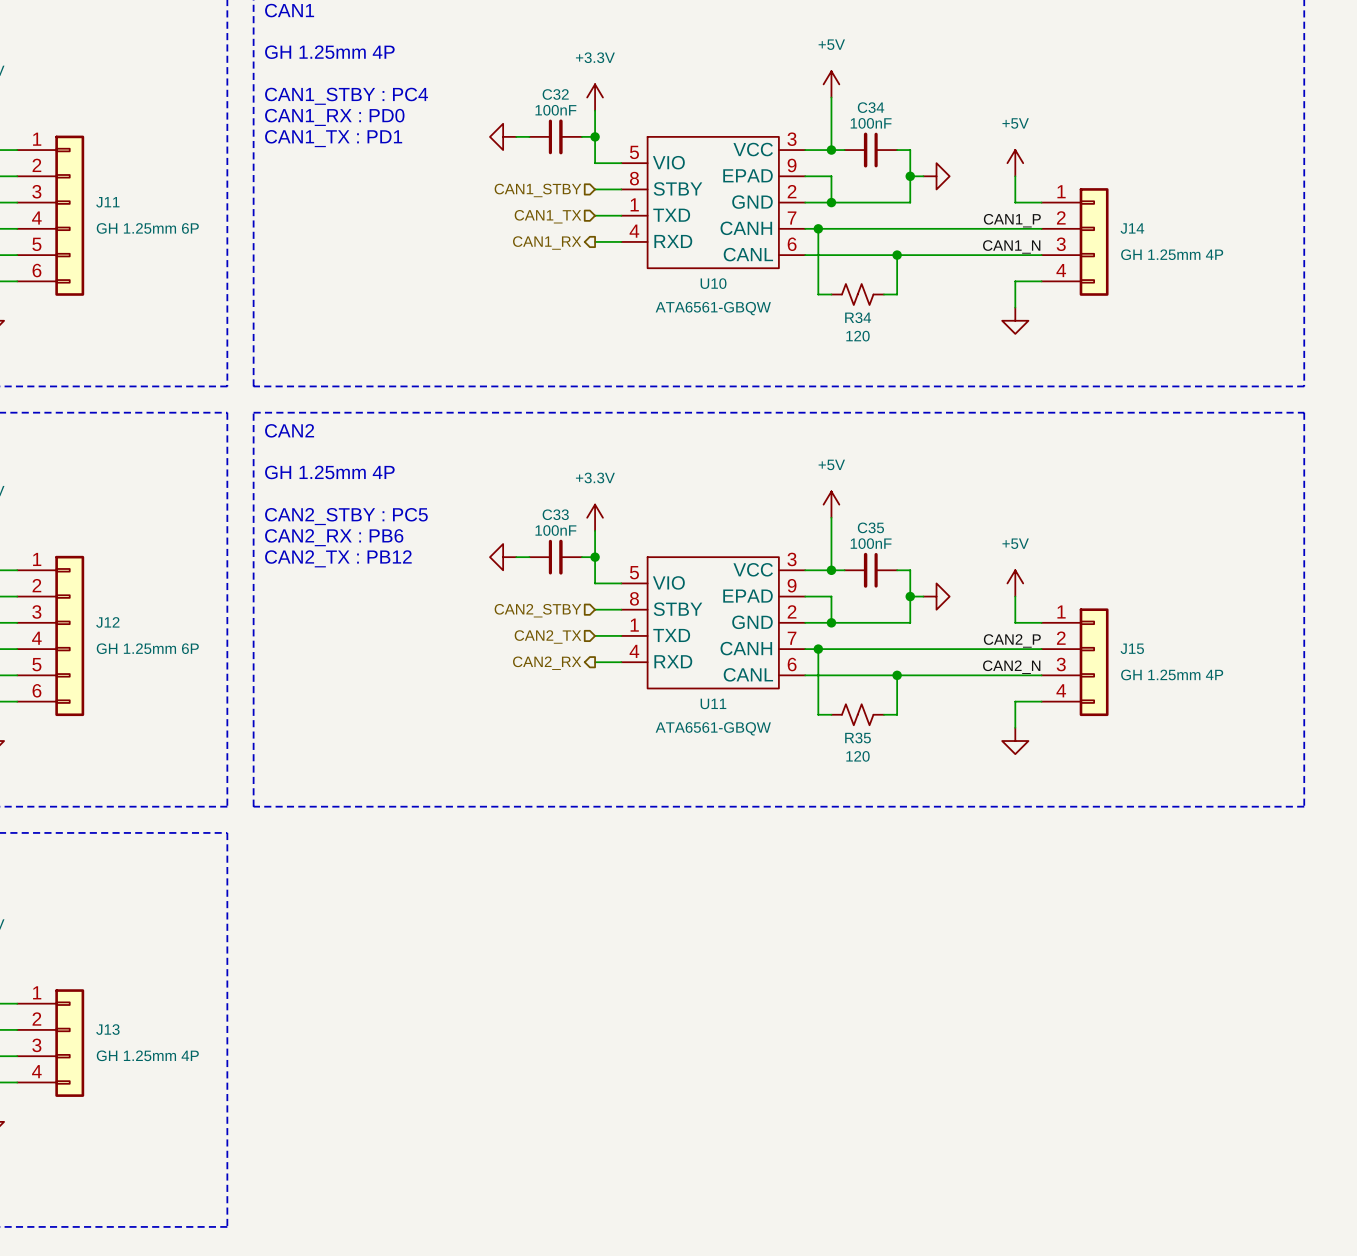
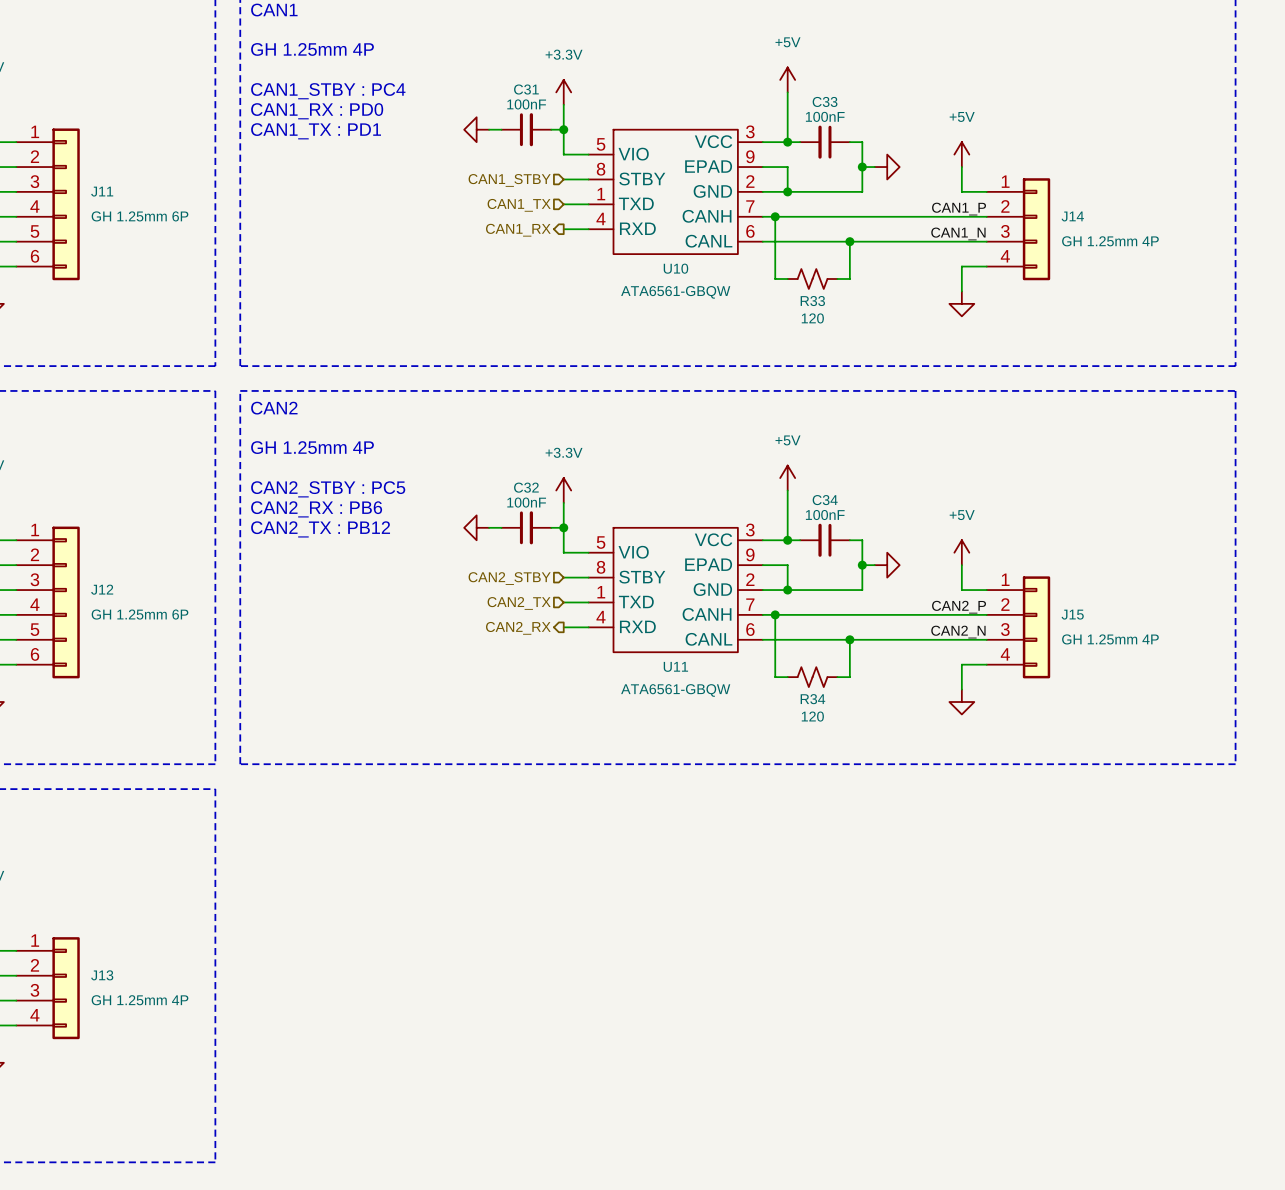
C32 name: C32 (555, 94) -> C31 (526, 89)
C34 name: C34 (871, 107) -> C33 (825, 101)
R34 name: R34 (858, 317) -> R33 (812, 301)
C33 name: C33 (555, 514) -> C32 (526, 487)
C35 name: C35 (870, 527) -> C34 (825, 500)
R35 name: R35 (858, 738) -> R34 (812, 699)

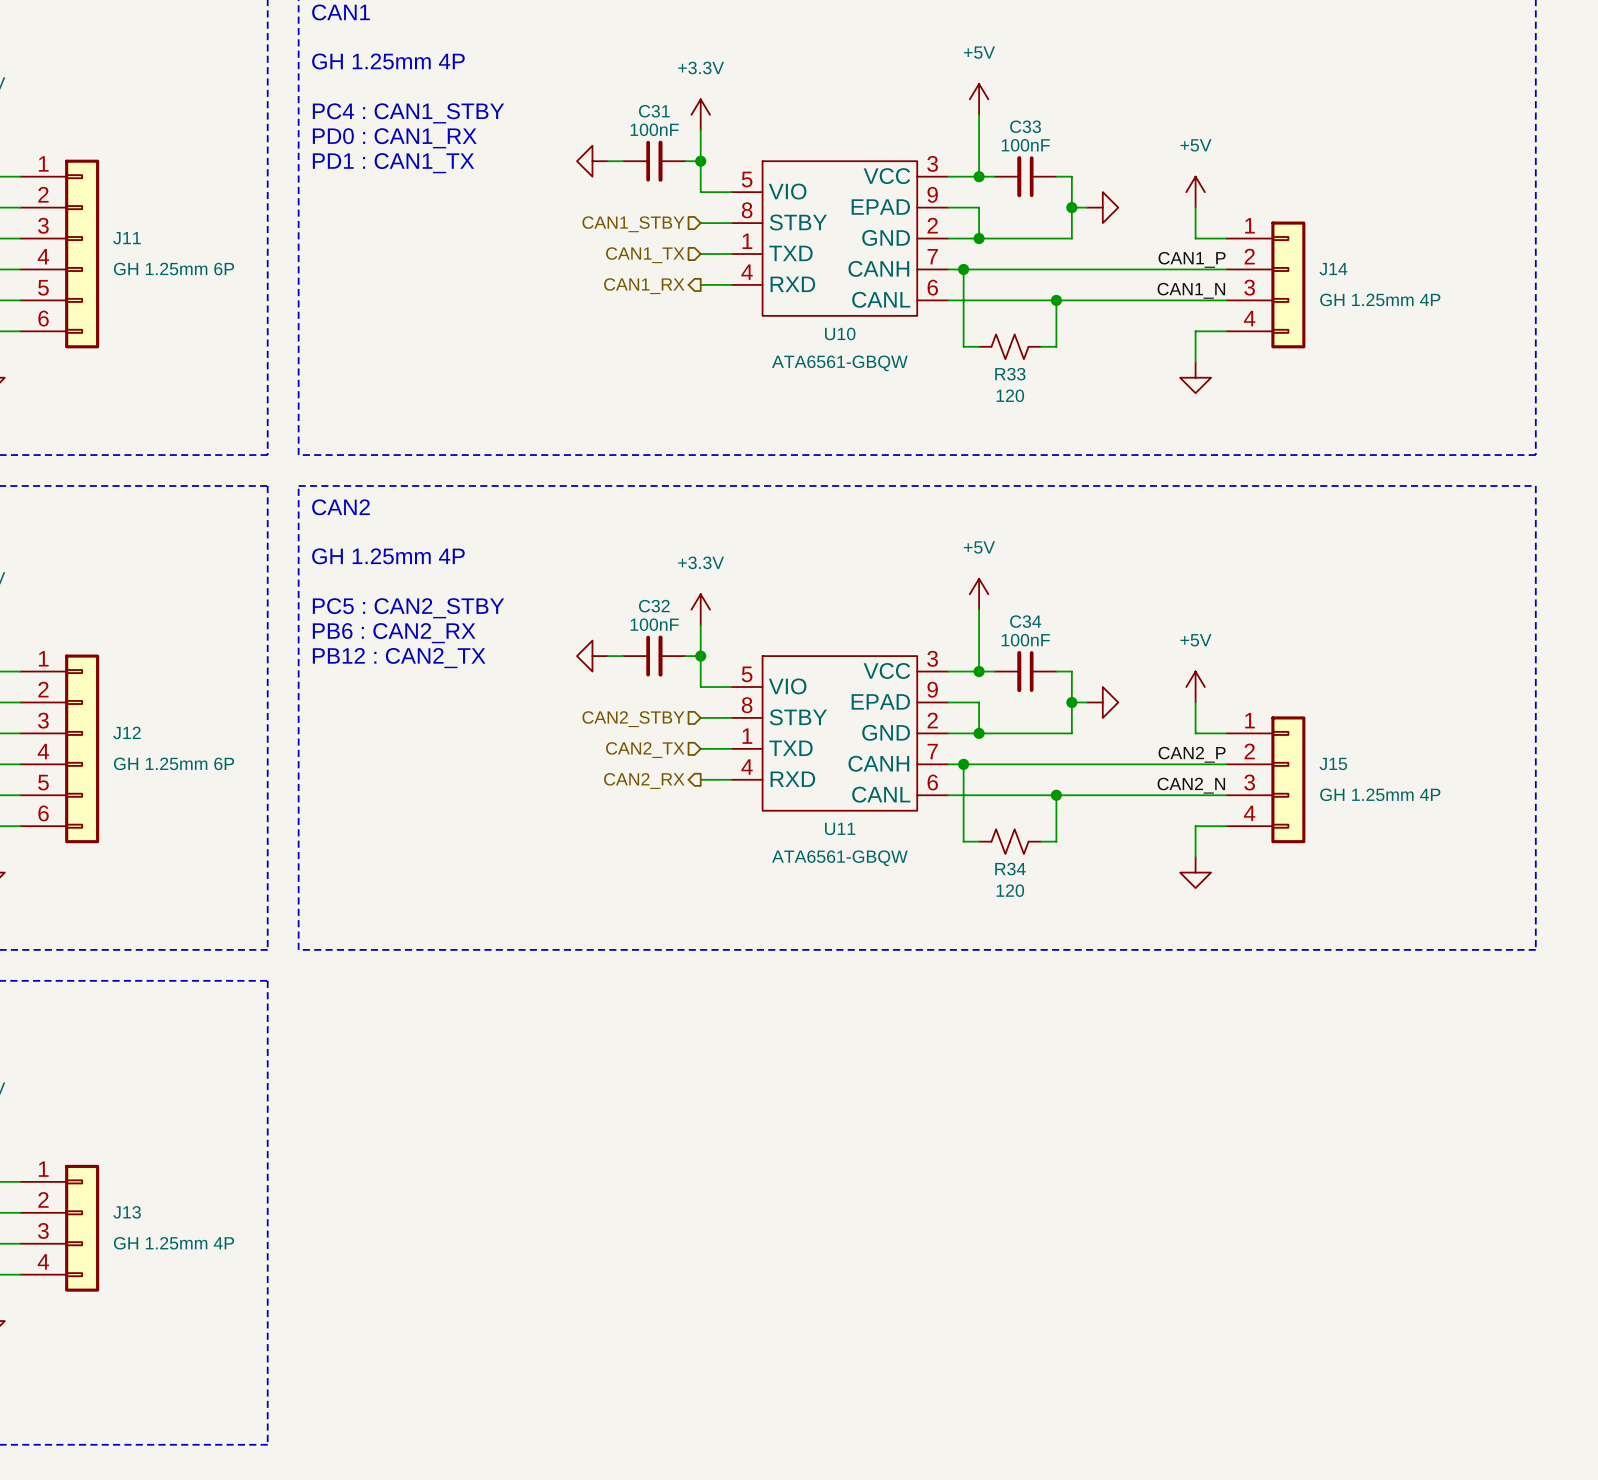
text: CAN1_STBY : PC4 (328, 91) -> PC4 : CAN1_STBY (408, 113)
text: CAN1_RX : PD0 (317, 111) -> PD0 : CAN1_RX (394, 138)
text: CAN1_TX : PD1 (316, 131) -> PD1 : CAN1_TX (393, 163)
text: CAN2_STBY : PC5 (328, 489) -> PC5 : CAN2_STBY (408, 608)
text: CAN2_RX : PB6 (316, 509) -> PB6 : CAN2_RX (394, 633)
text: CAN2_TX : PB12 (320, 529) -> PB12 : CAN2_TX (399, 658)

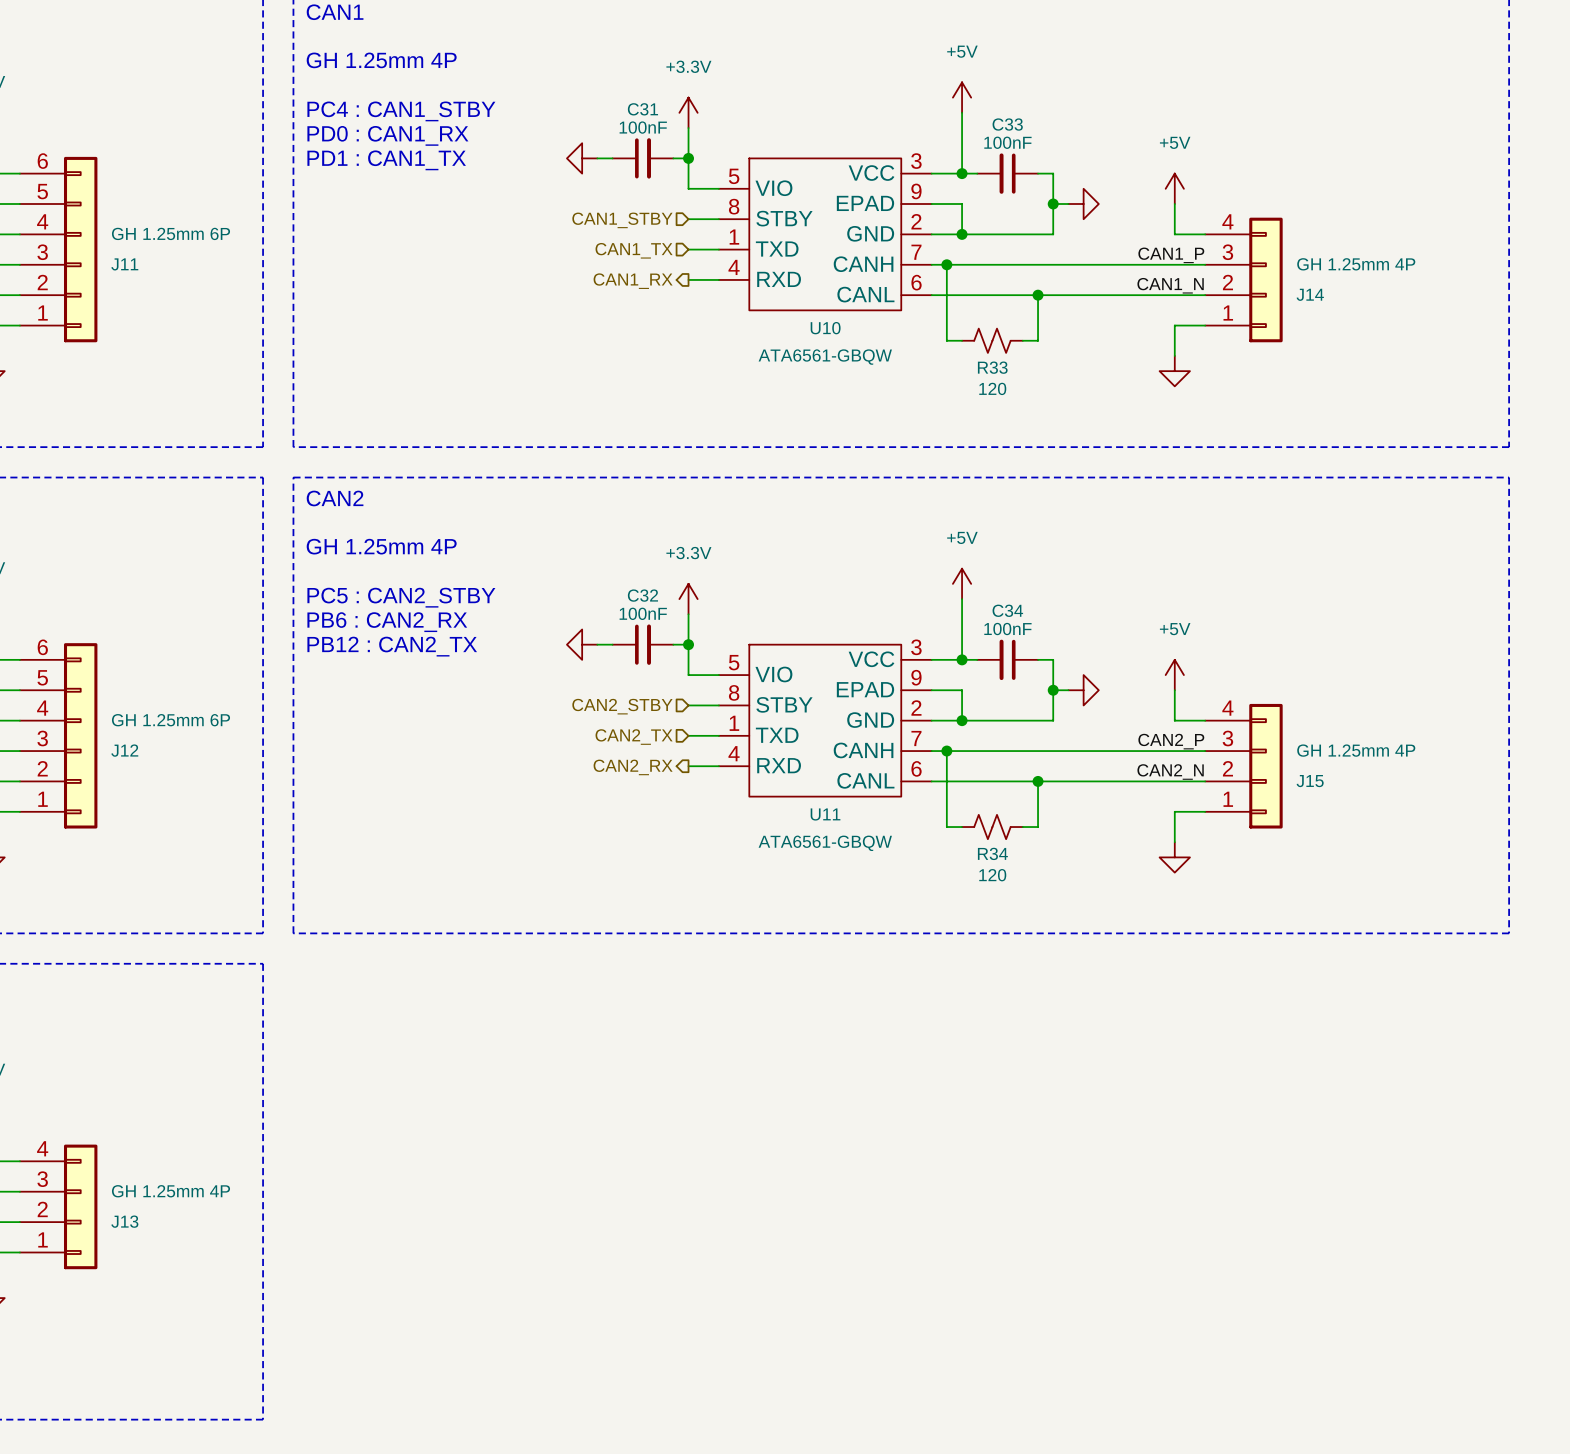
J11 flip: as is (82, 254) -> up-down (80, 249)
J14 flip: as is (1288, 284) -> up-down (1265, 279)
J12 flip: as is (82, 748) -> up-down (80, 735)
J15 flip: as is (1288, 779) -> up-down (1265, 766)
J13 flip: as is (82, 1228) -> up-down (80, 1206)

